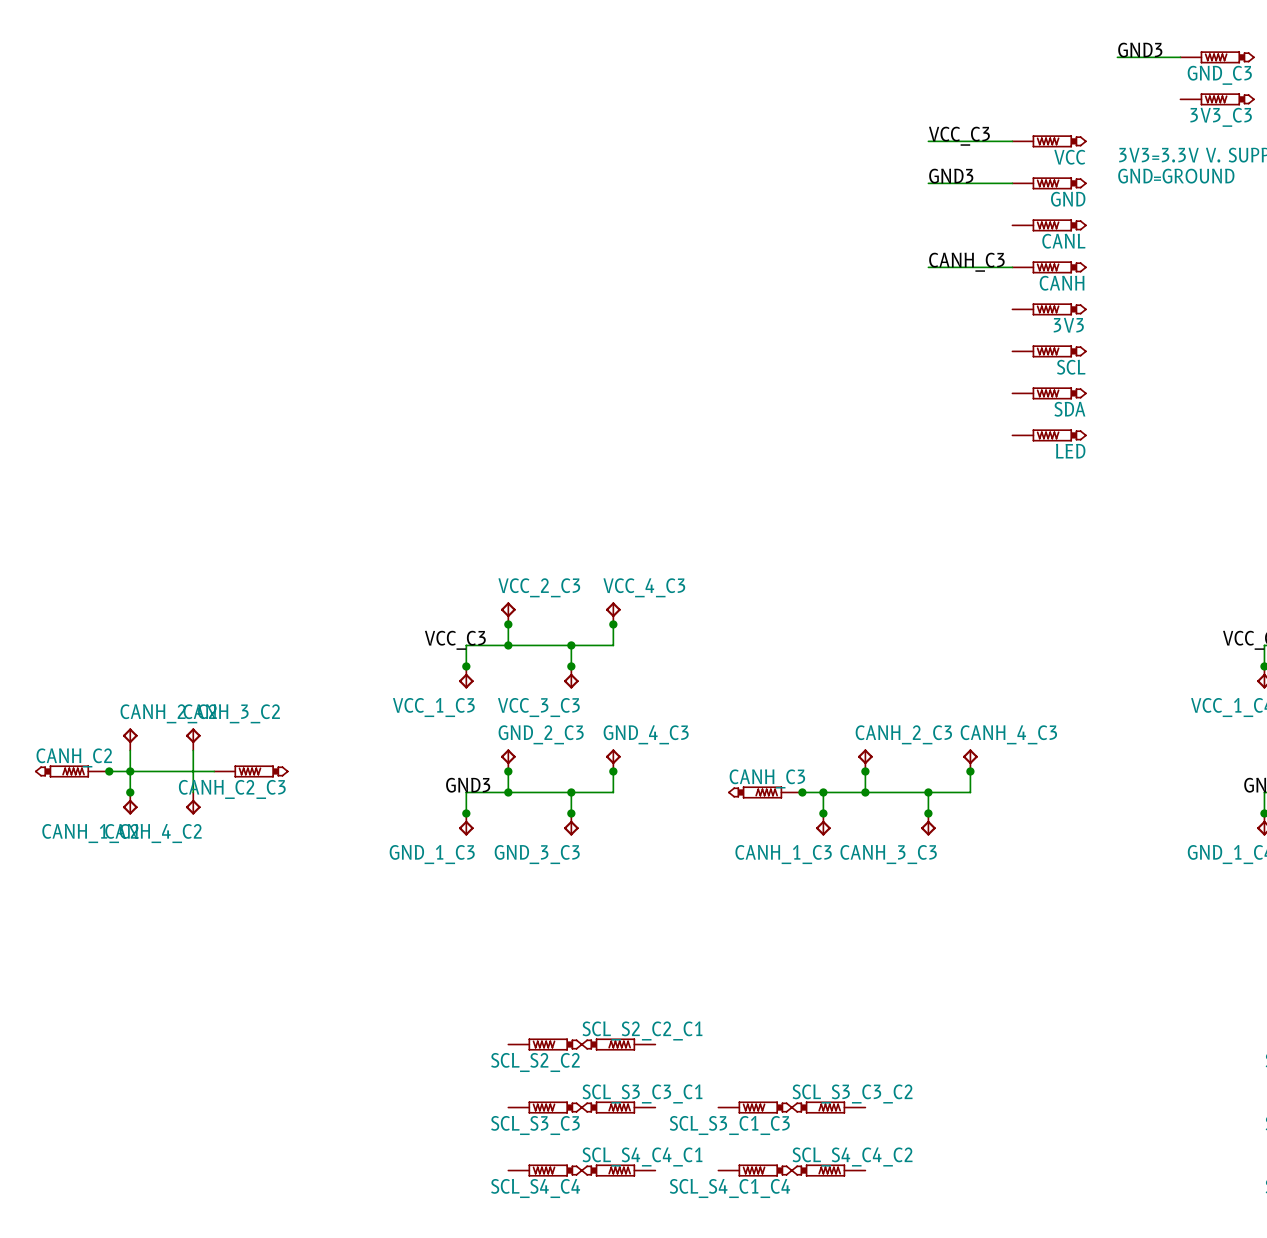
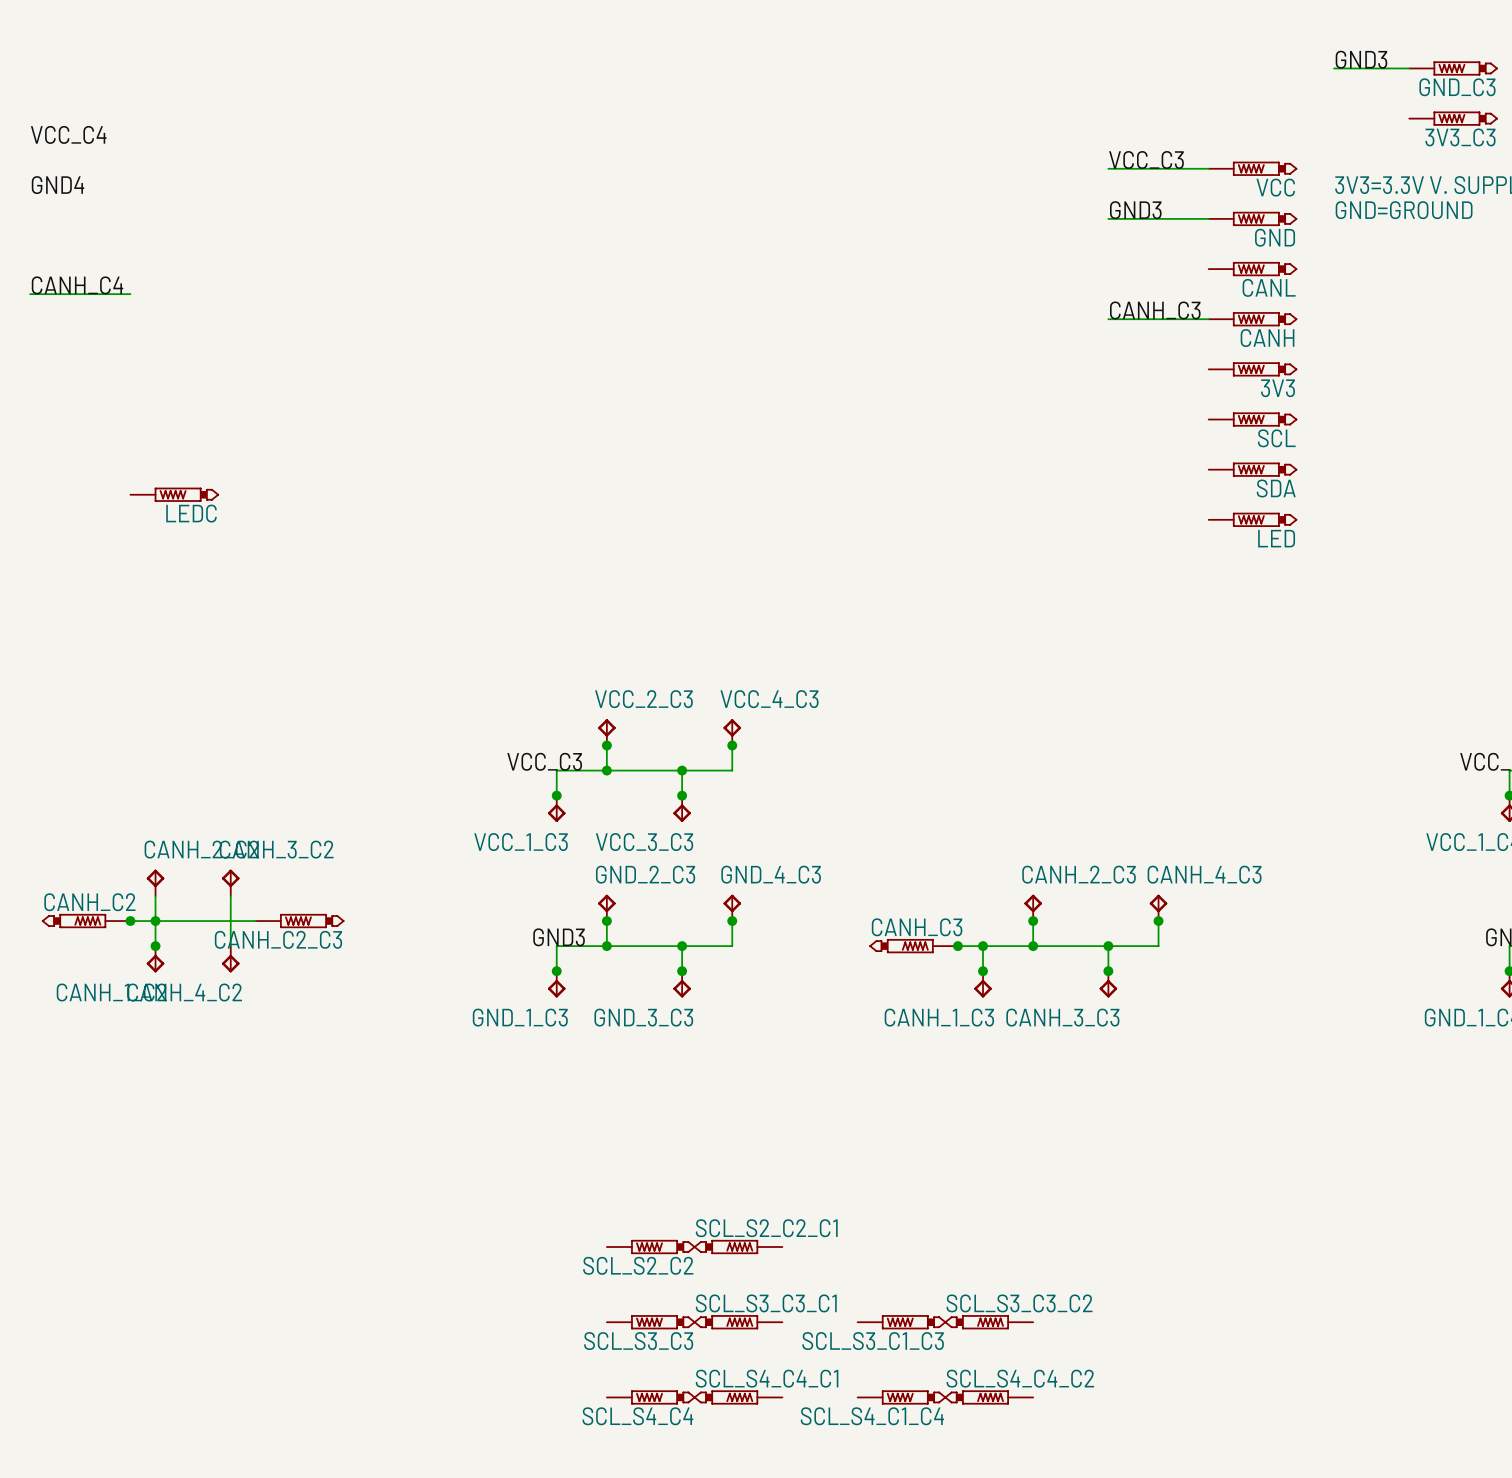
label: none -> VCC_C4 (68, 134)
label: none -> GND4 (58, 185)
label: none -> CANH_C4 (77, 285)
wire: none -> (30, 294) (130, 294)
LEDC: none -> (174, 494)

